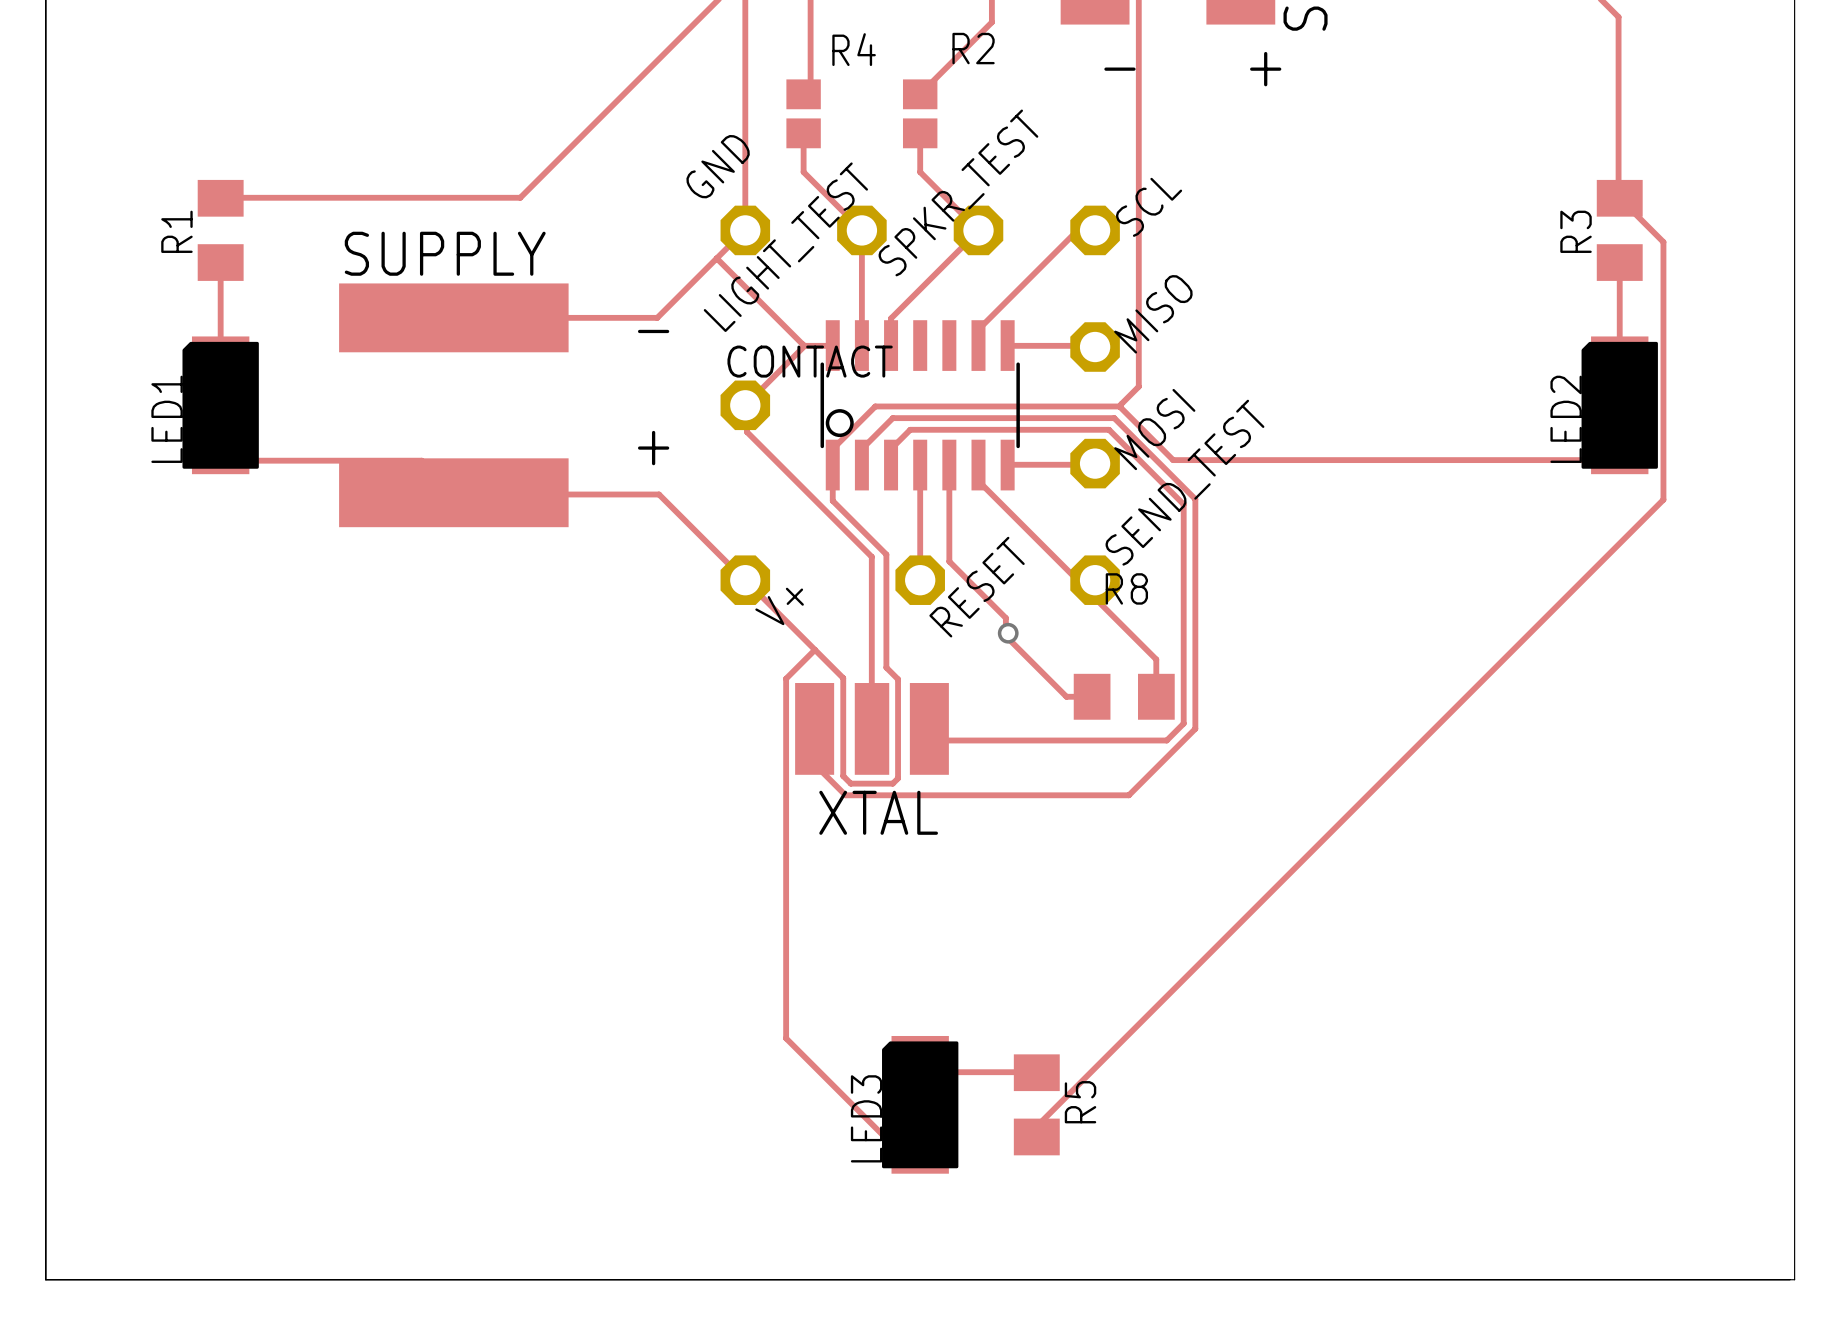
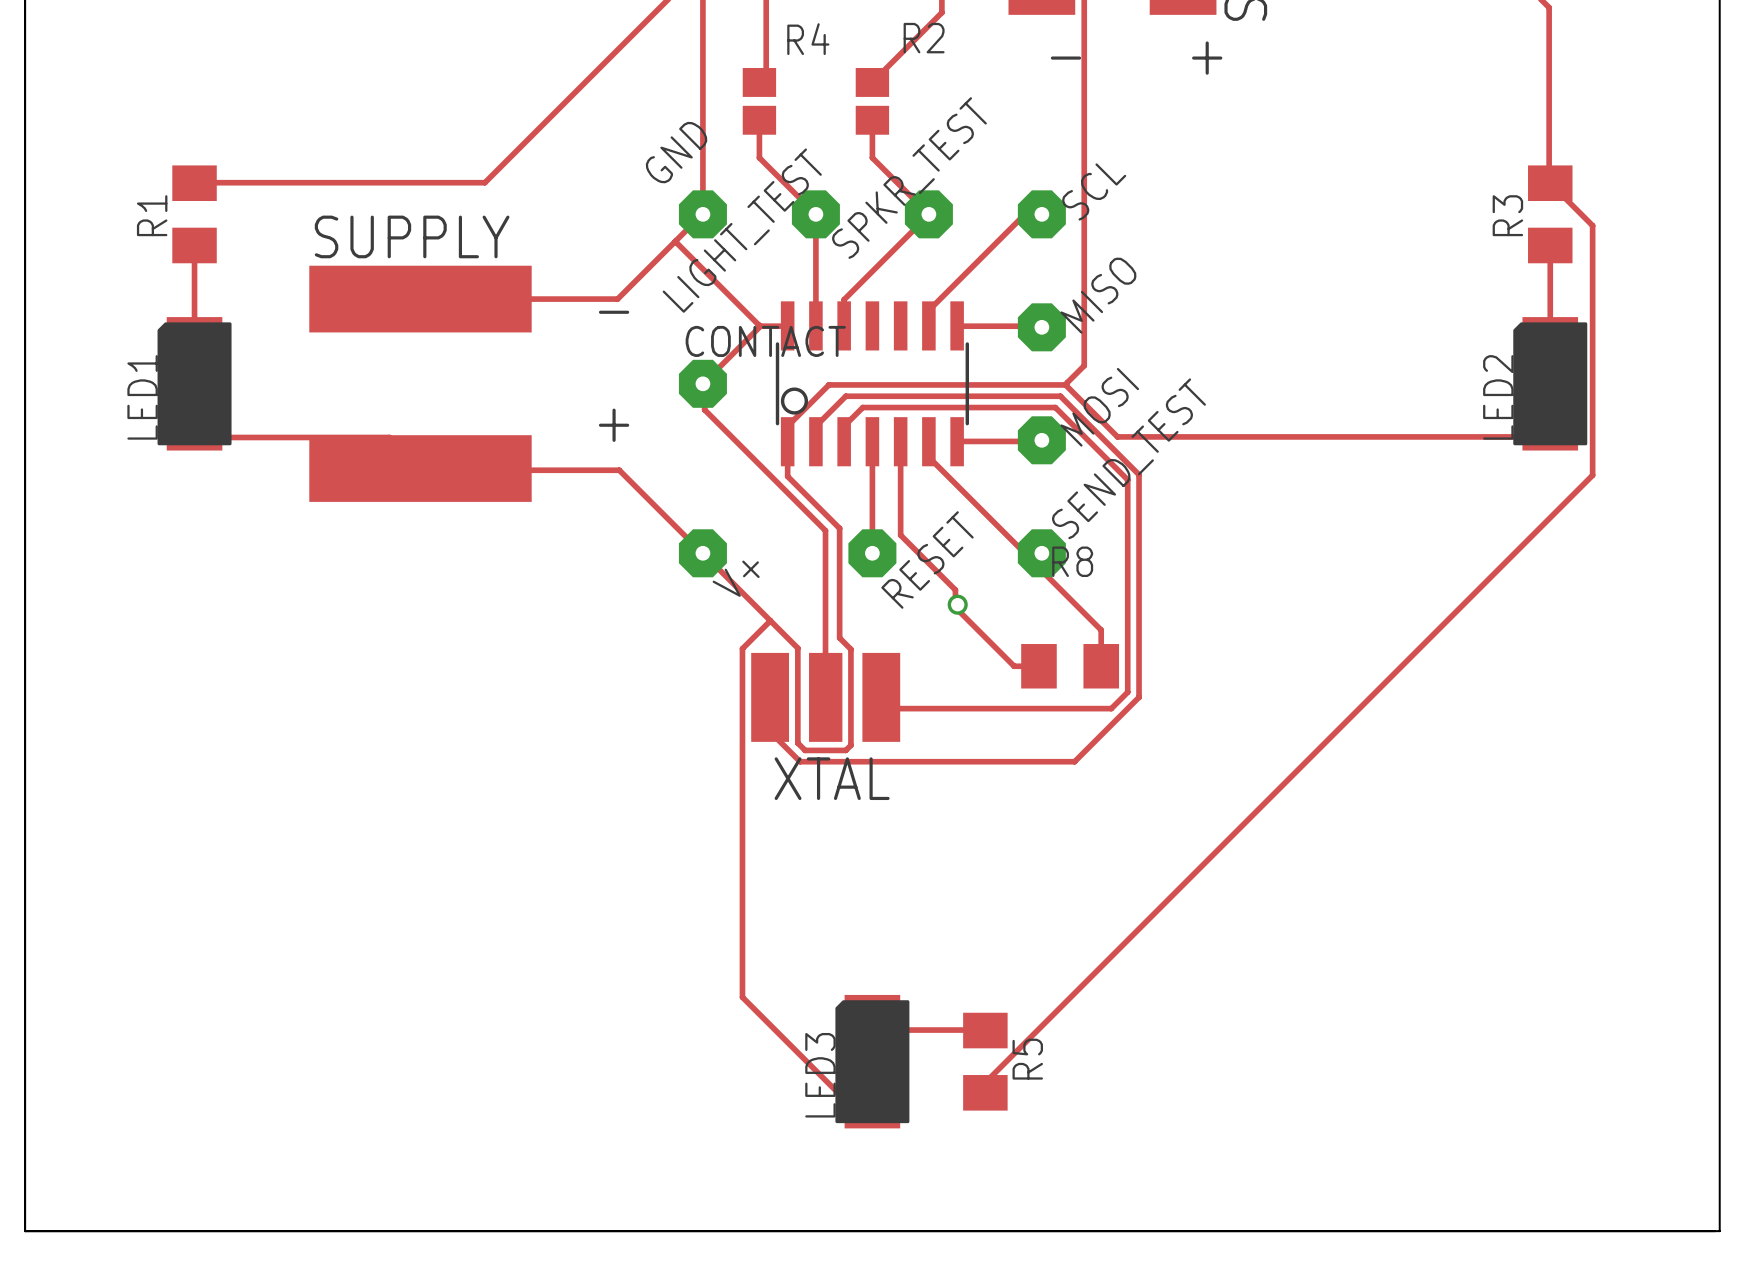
GND footprint: [720, 205, 771, 256] -> [678, 190, 727, 239]
LIGHT_TEST footprint: [837, 205, 887, 256] -> [791, 190, 840, 239]
SPKR_TEST footprint: [953, 205, 1004, 256] -> [904, 190, 953, 239]
SCL footprint: [1070, 205, 1120, 256] -> [1017, 190, 1066, 239]
MISO footprint: [1070, 322, 1120, 372] -> [1017, 303, 1066, 352]
CONTACT footprint: [720, 380, 771, 431] -> [678, 359, 727, 408]
MOSI footprint: [1070, 438, 1120, 489] -> [1017, 416, 1066, 465]
V+ footprint: [720, 555, 771, 605] -> [678, 529, 727, 578]
RESET footprint: [895, 555, 945, 605] -> [848, 529, 897, 578]
SEND_TEST footprint: [1070, 555, 1120, 605] -> [1017, 529, 1066, 578]

